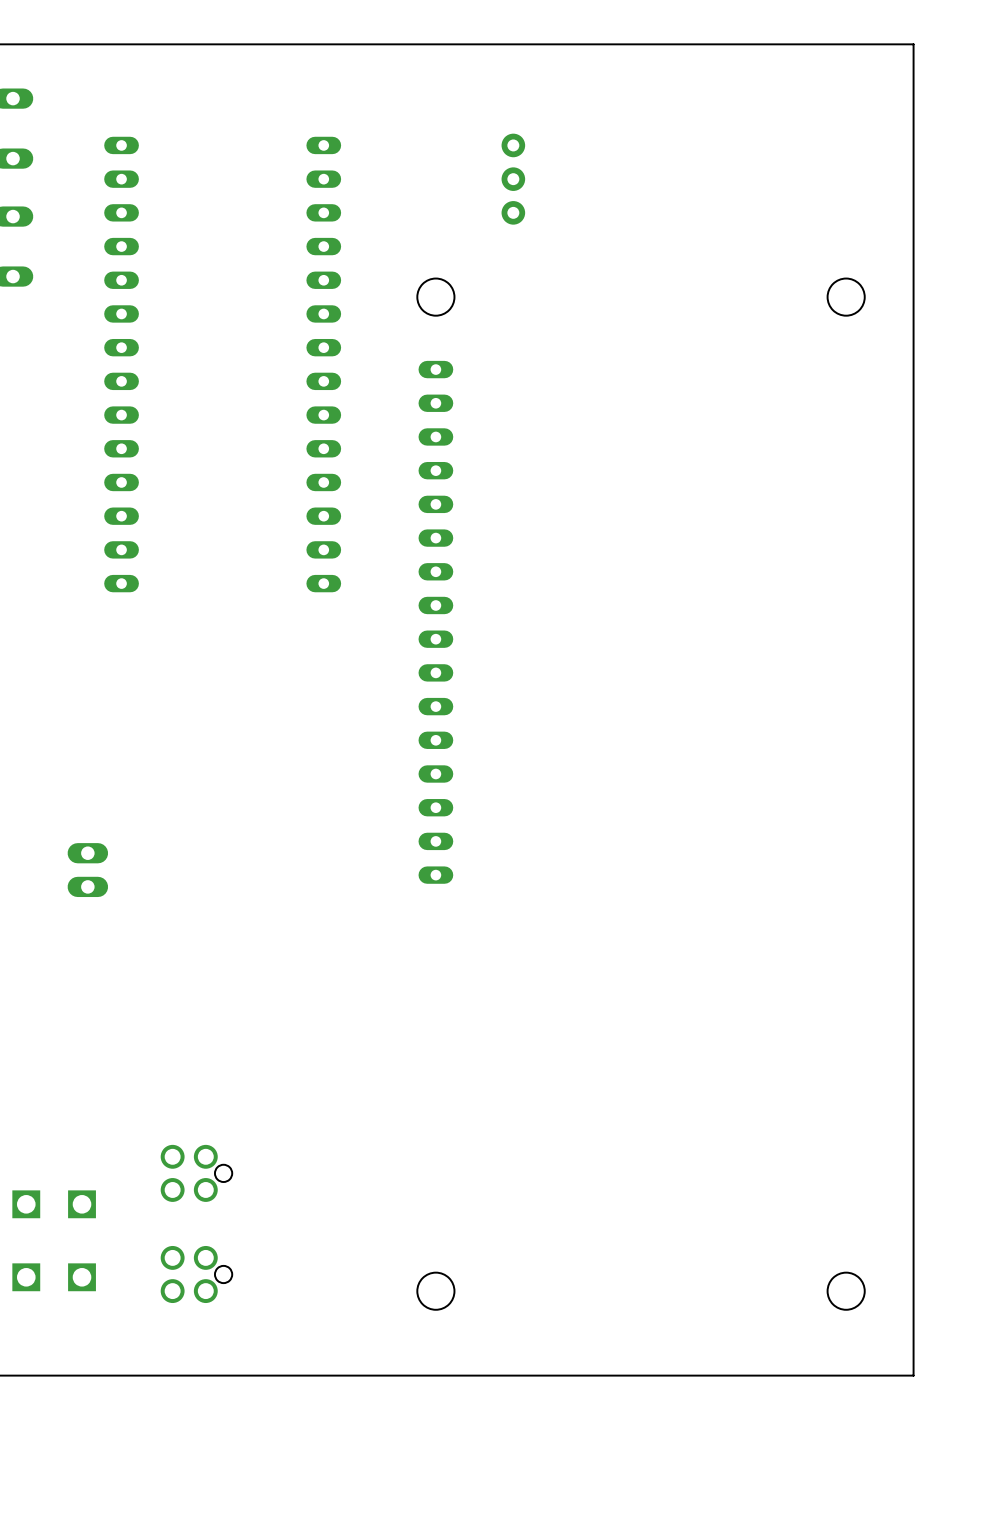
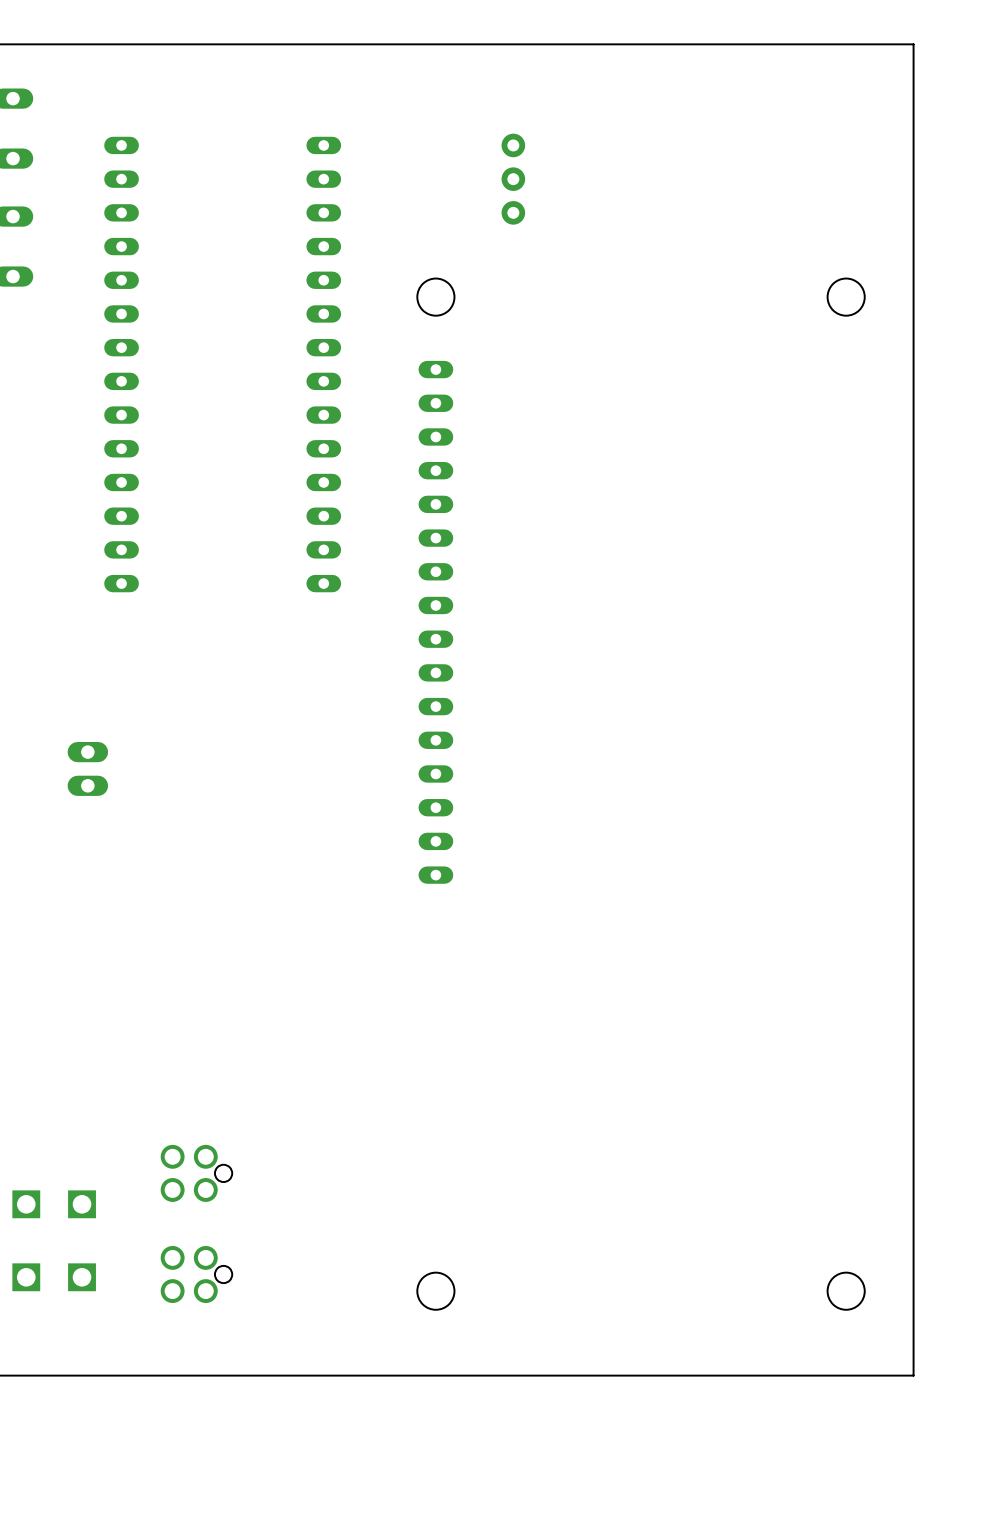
part position: (87, 870) -> (87, 768)

